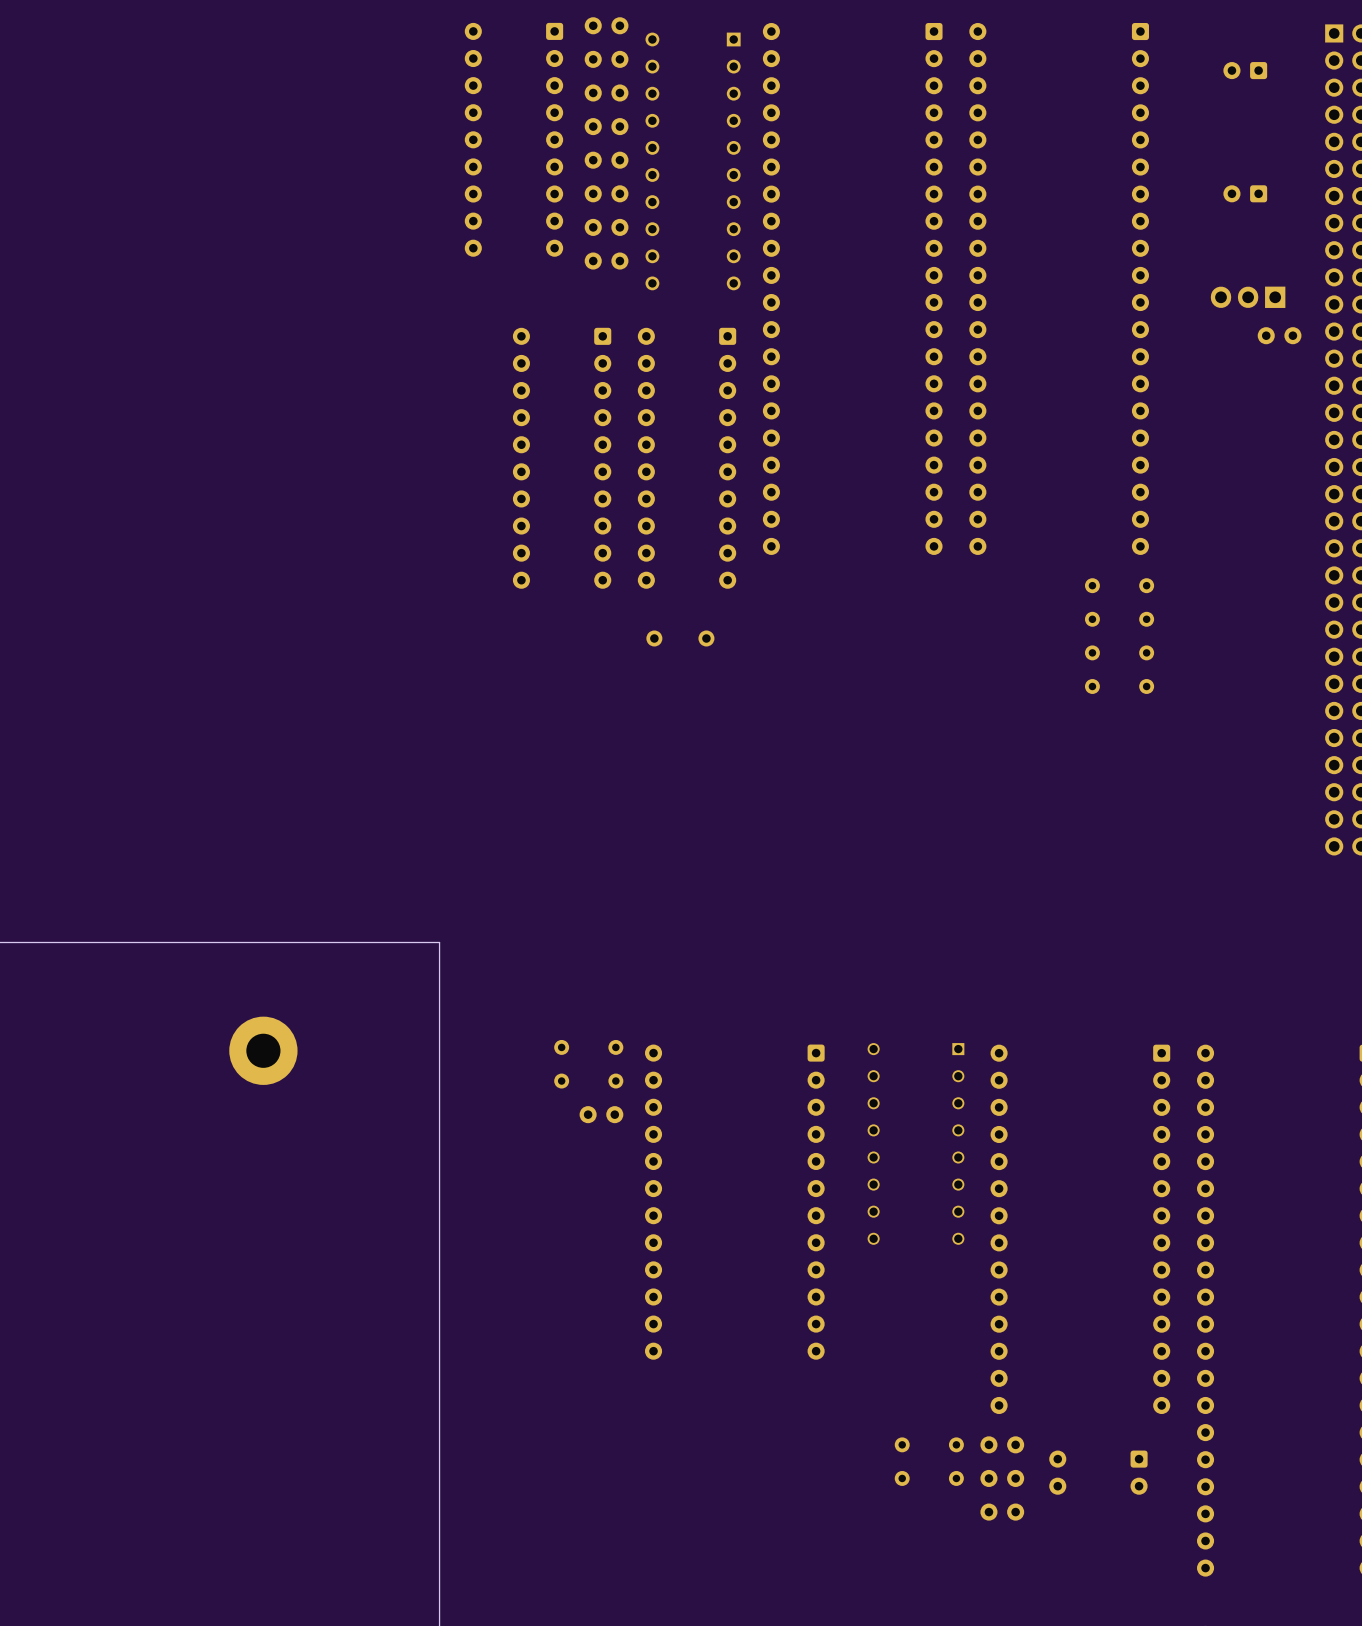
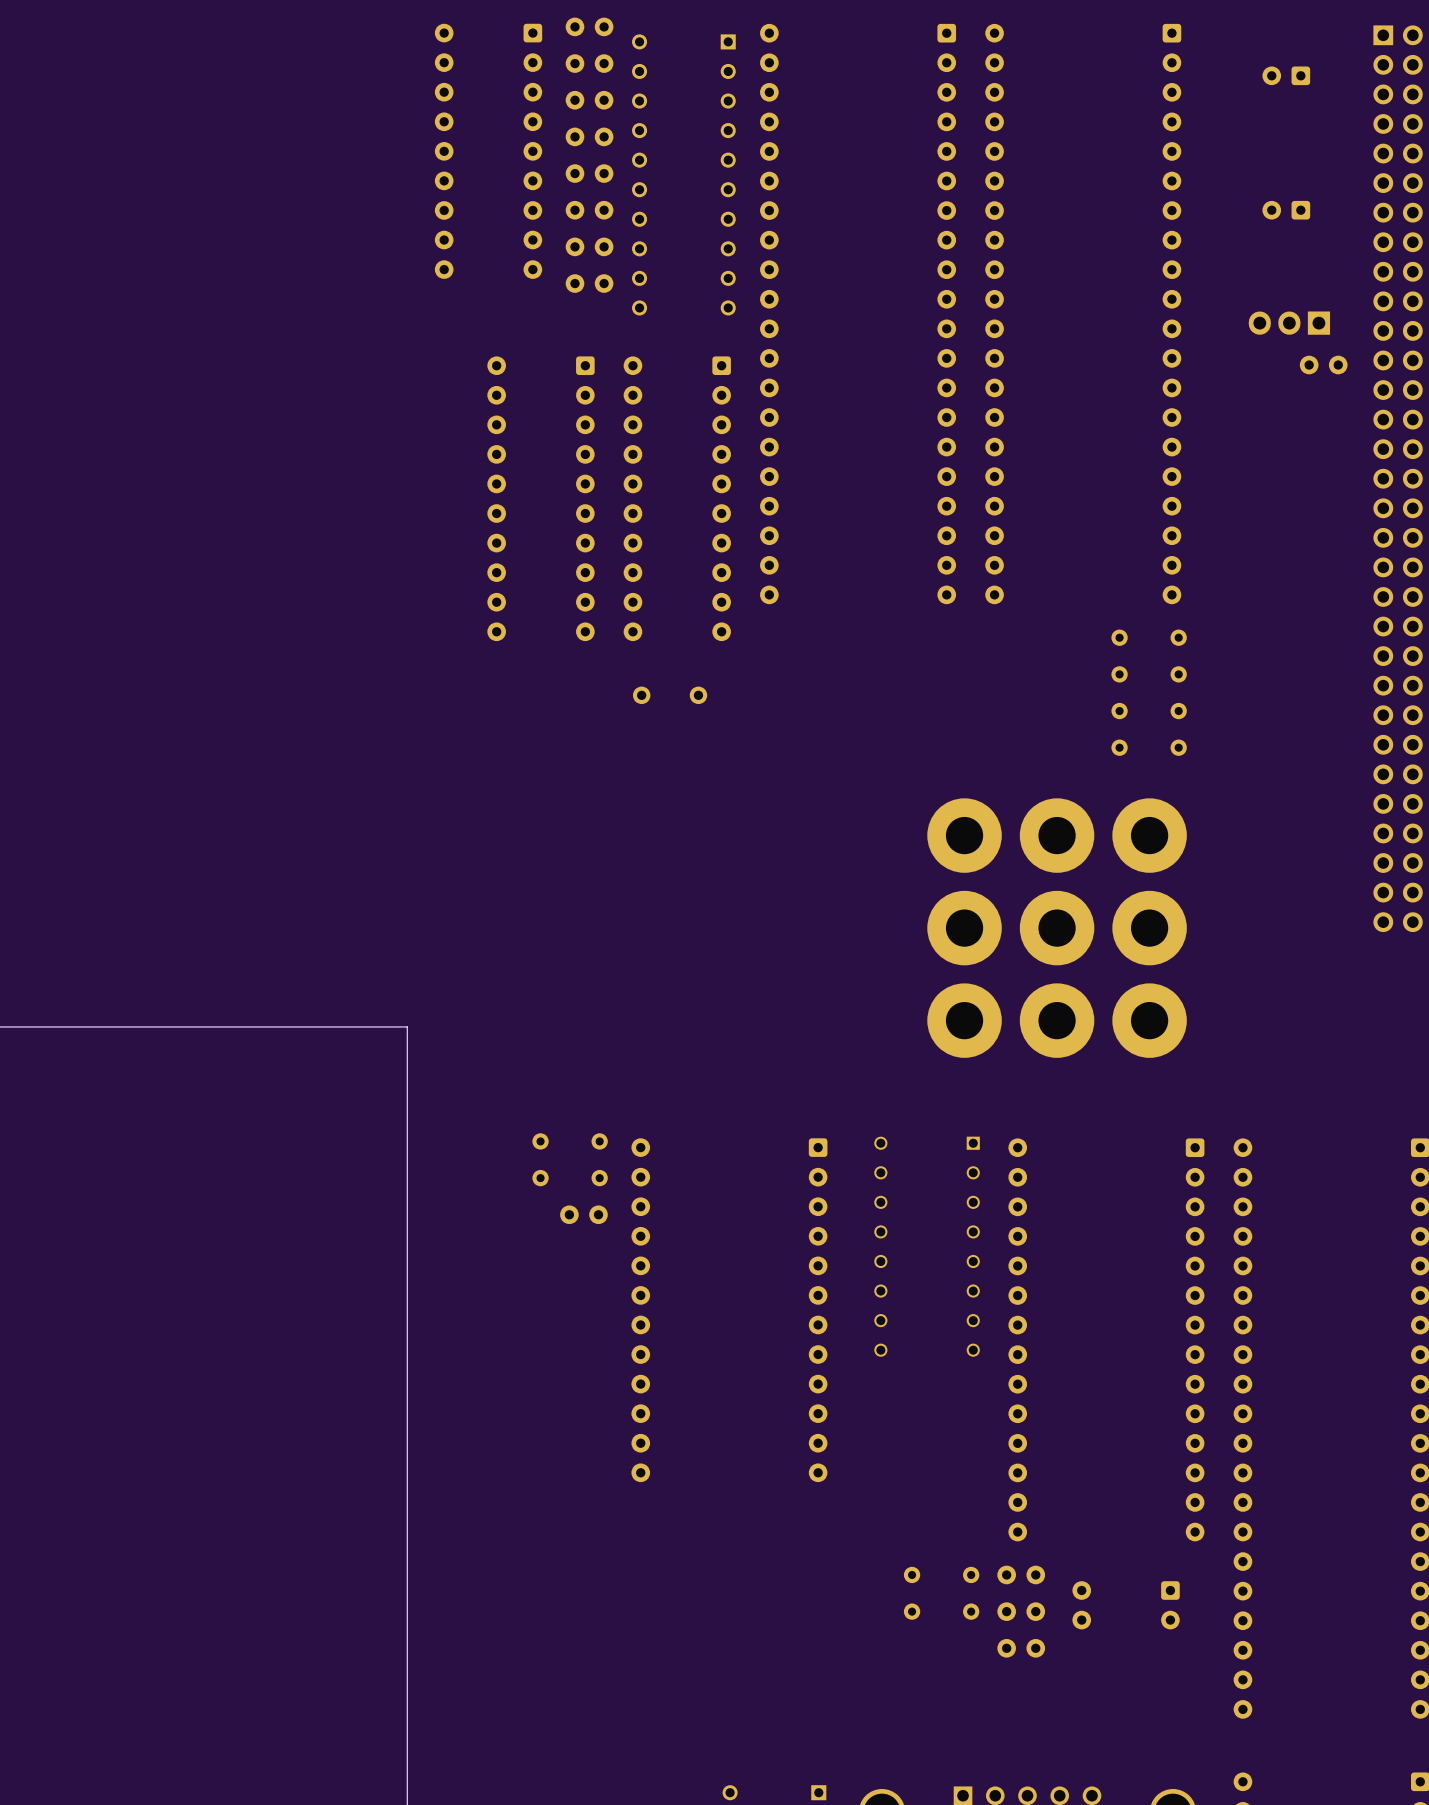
part: none -> (964, 835)
part: none -> (1057, 835)
part: none -> (1149, 835)
part: none -> (964, 928)
part: none -> (1057, 928)
part: none -> (1149, 928)
part: none -> (964, 1020)
part: none -> (1057, 1020)
part: none -> (1149, 1020)
part: (263, 1050) -> none

